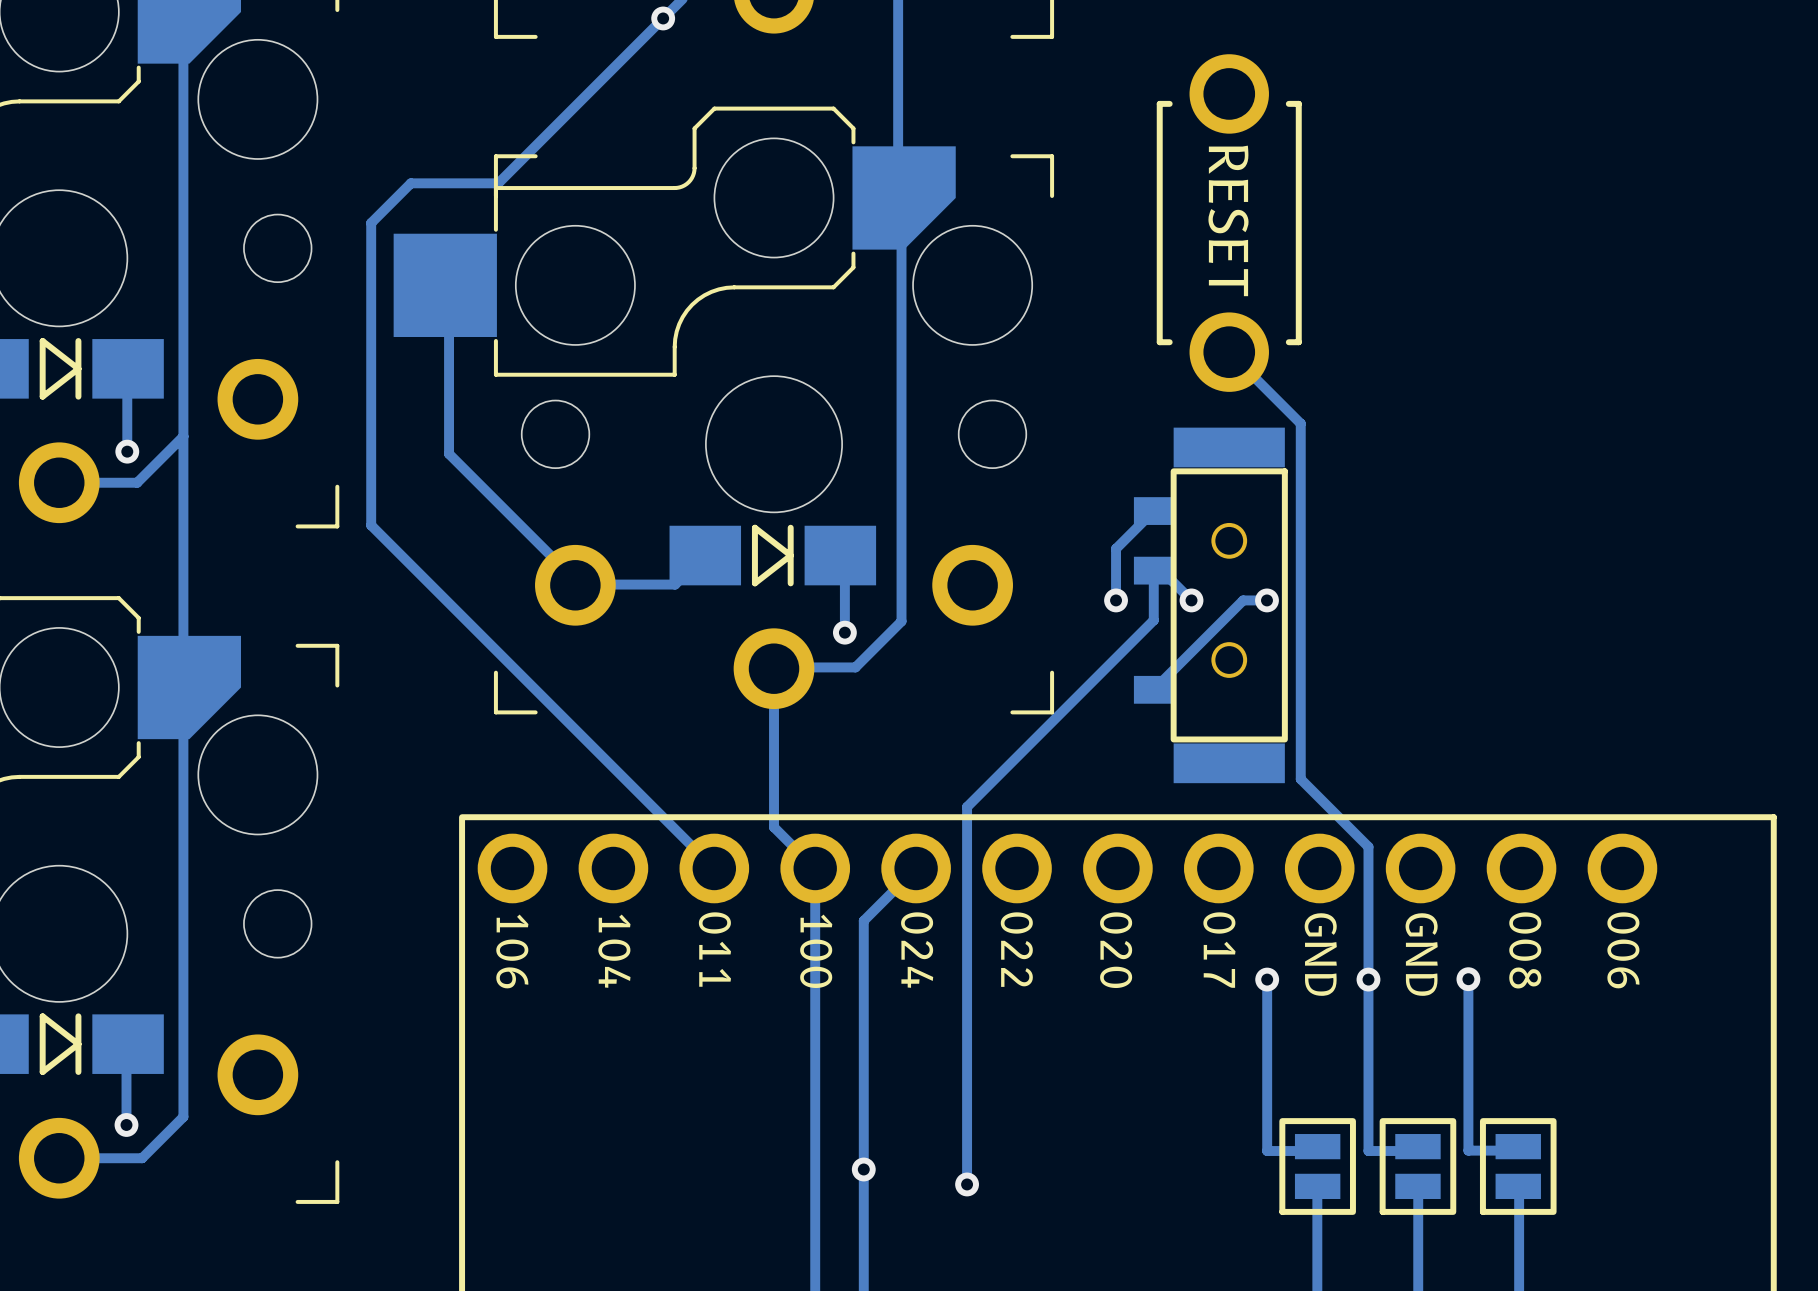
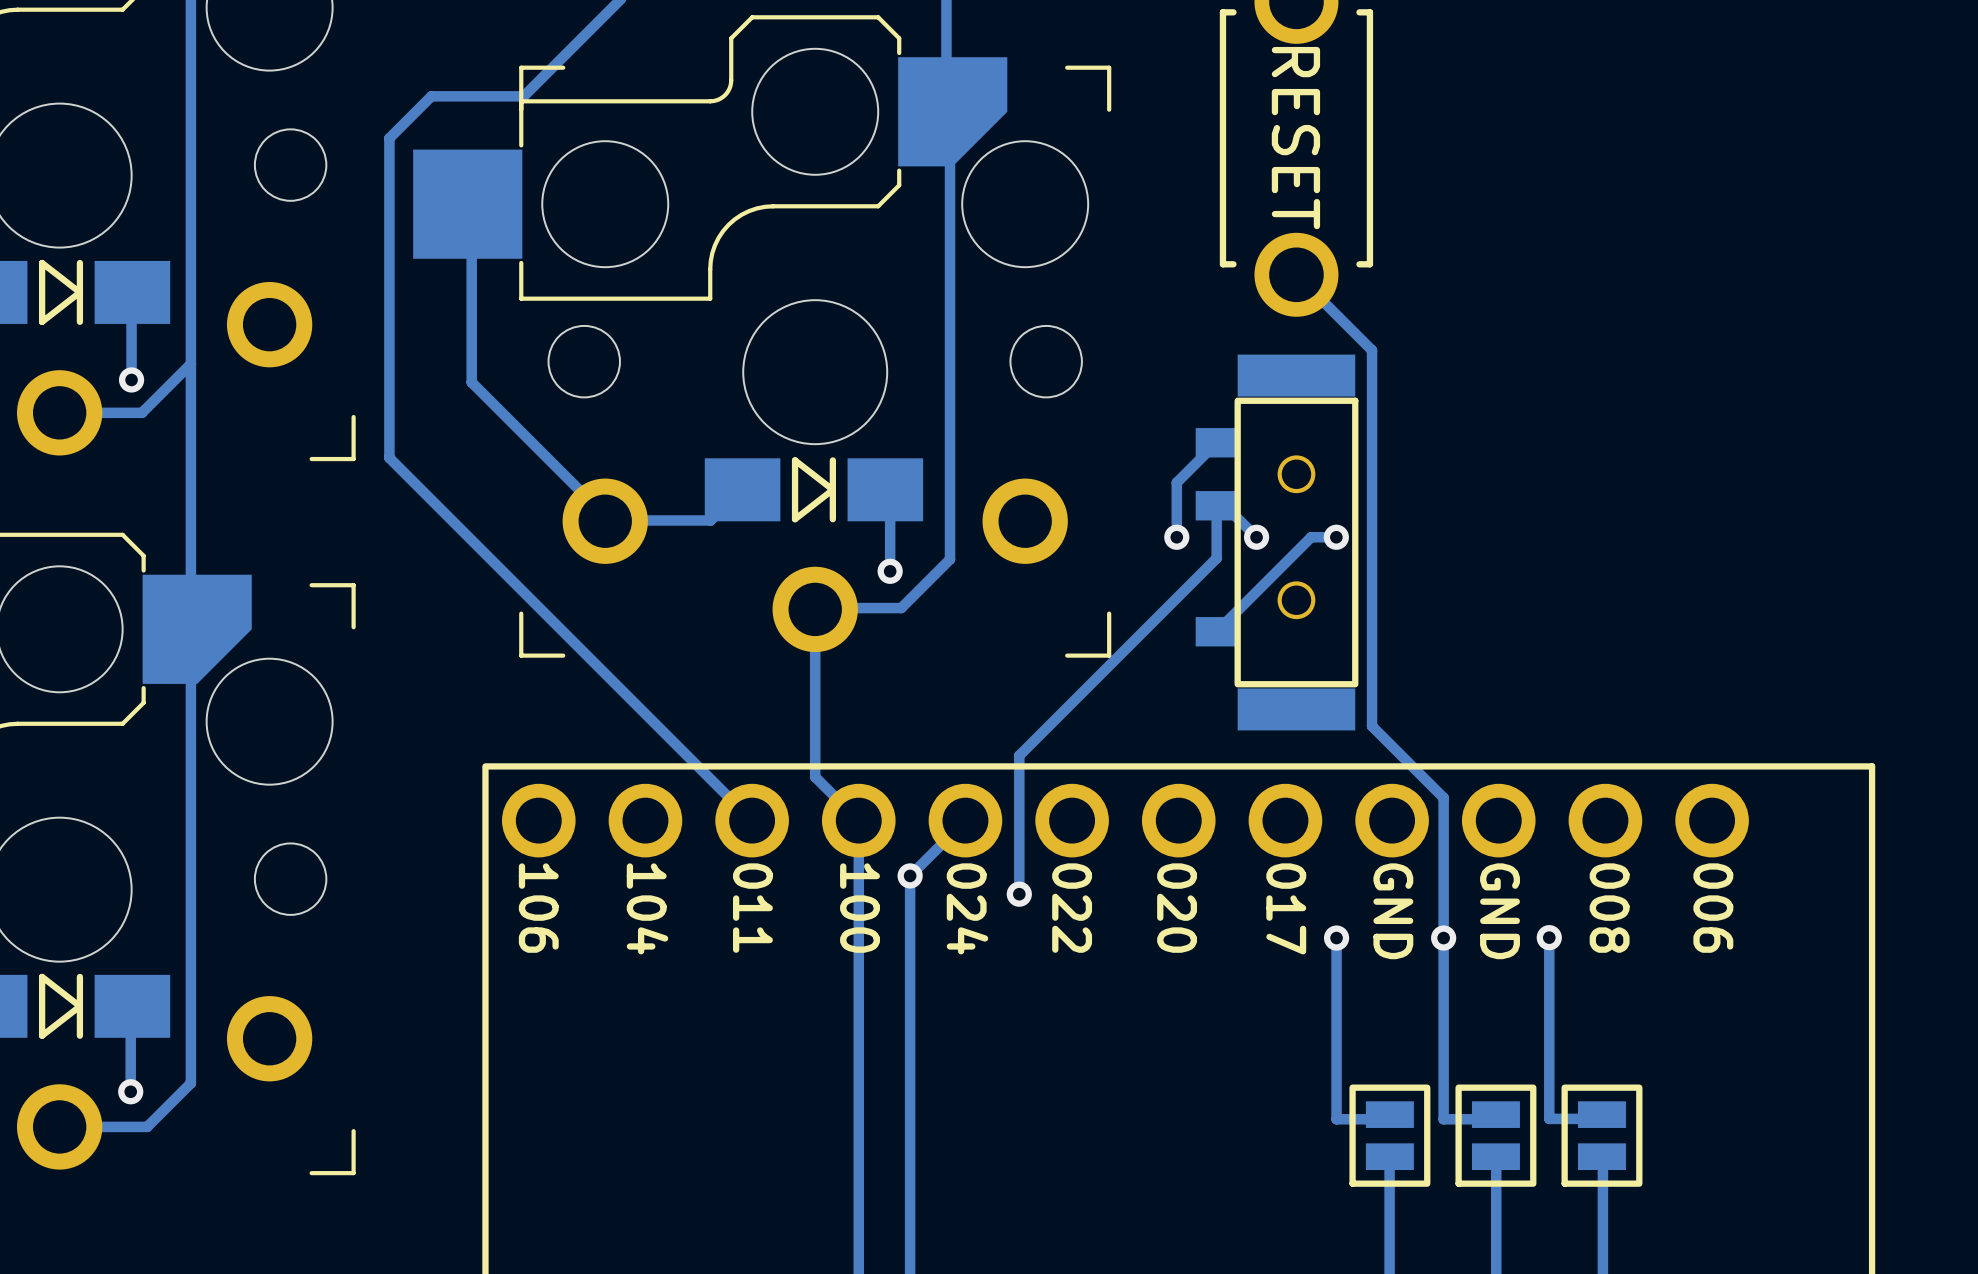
via: none -> (910, 875)
track: (967, 938) (967, 1184) -> none
via: none -> (1019, 894)
via: (863, 1169) -> none
via: (967, 1184) -> none

